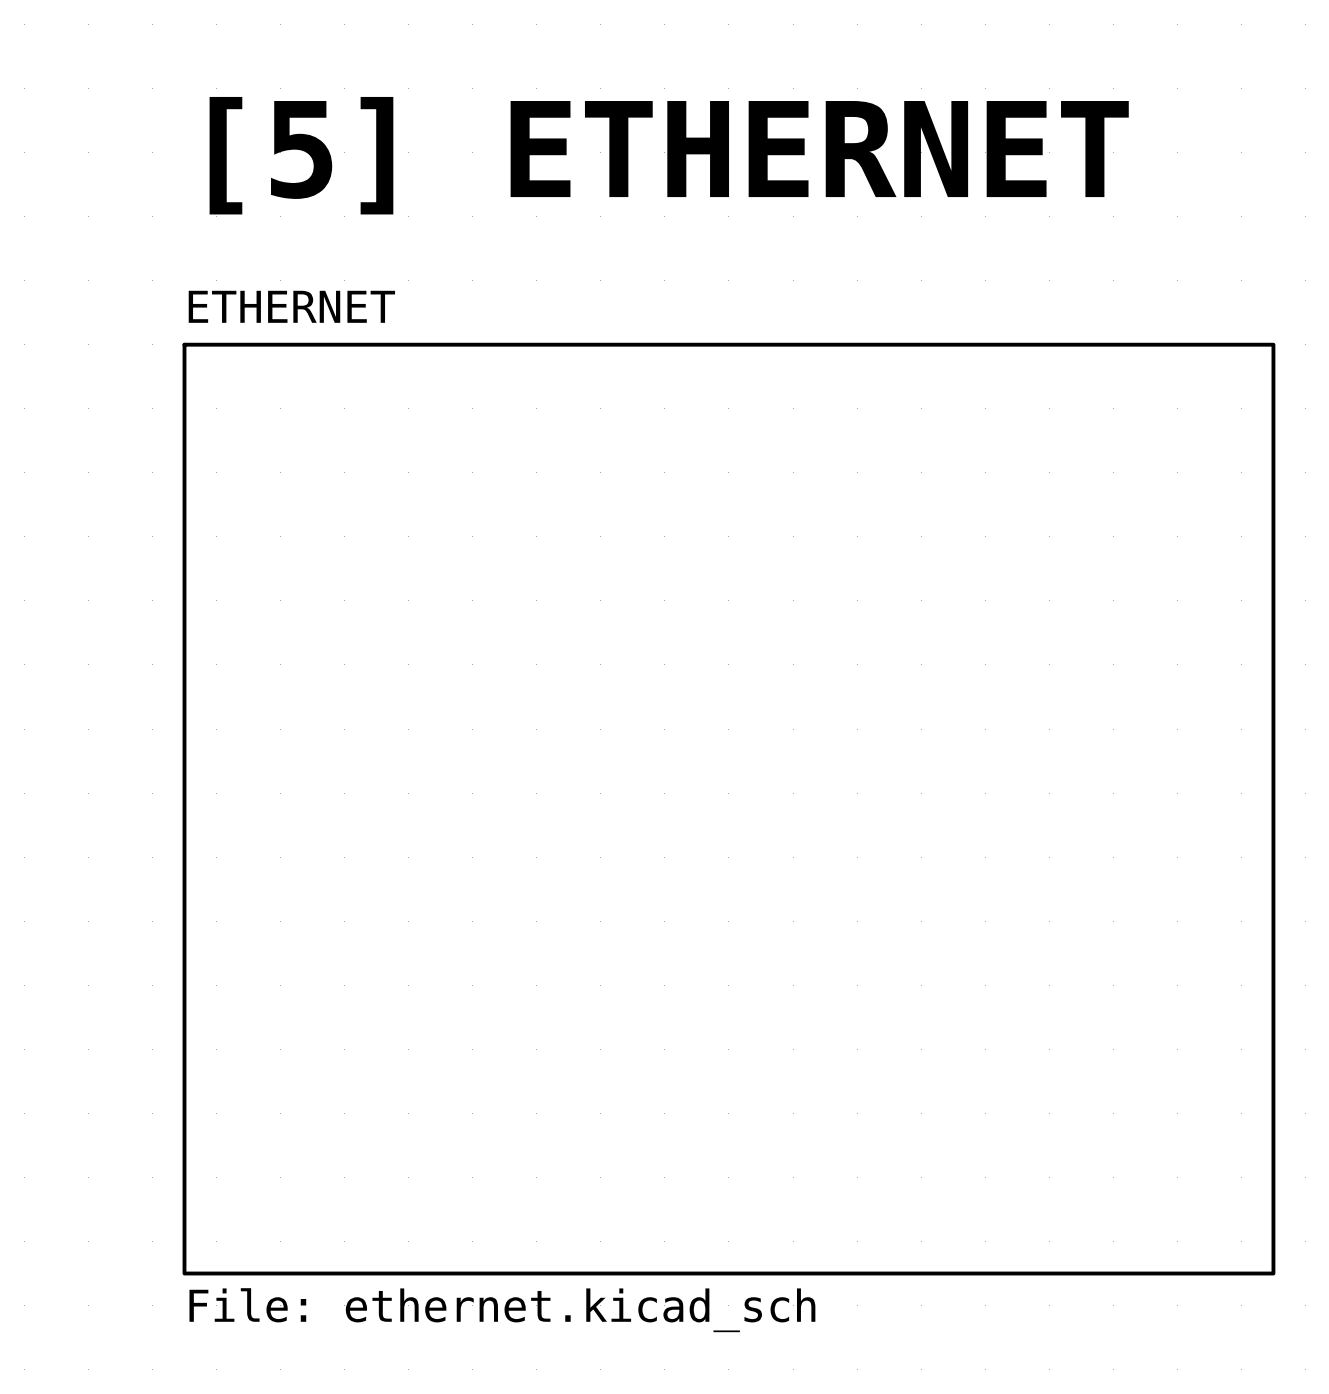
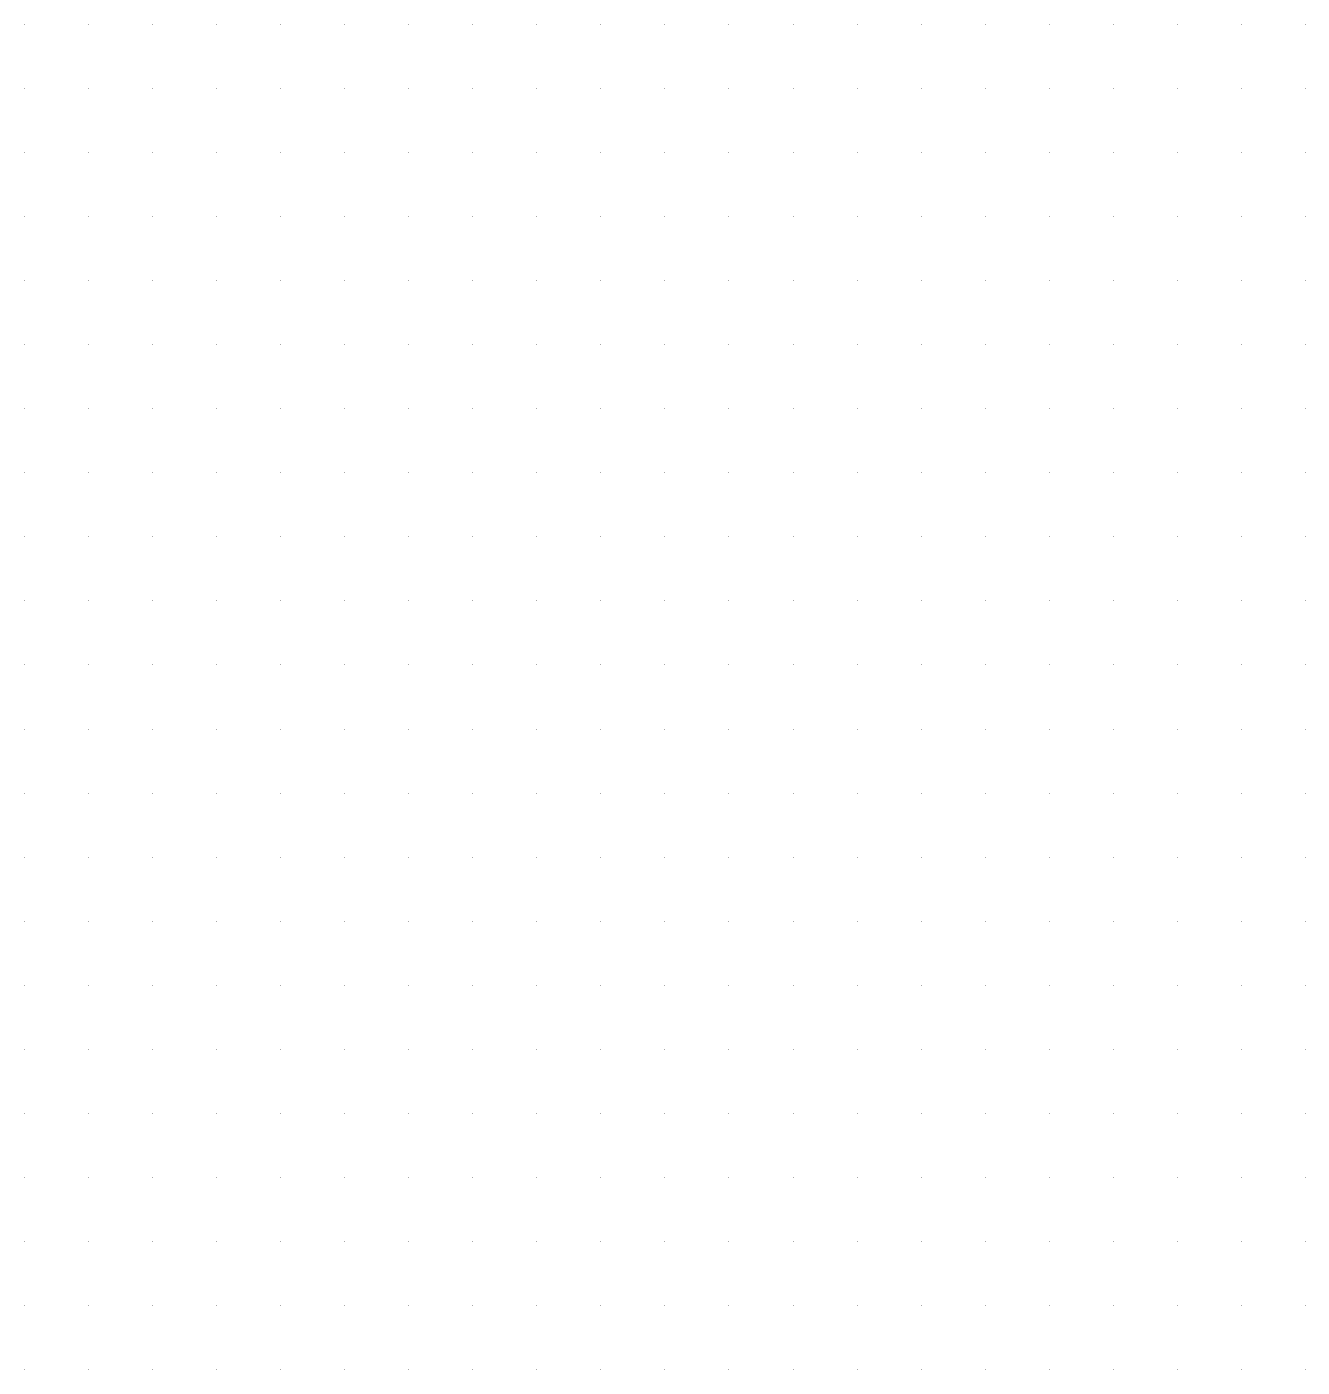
text: [5] ETHERNET (669, 155) -> none
sheet ETHERNET: File: ethernet.kicad_sch (728, 809) -> none

